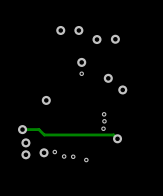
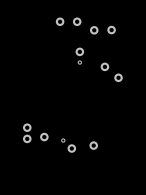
via: (46, 100) -> none
via: (104, 114) -> none
via: (104, 121) -> none
via: (103, 128) -> none
track: (22, 129) (38, 129) (44, 134) (113, 134) (117, 138) -> none
via: (22, 129) -> none
via: (117, 138) -> none
via: (54, 152) -> none
via: (73, 156) -> none
via: (86, 160) -> none
via: none -> (93, 145)
via: none -> (71, 148)

